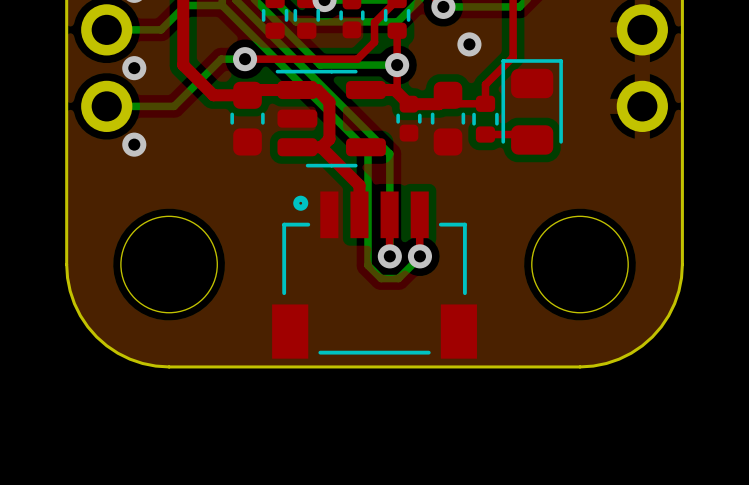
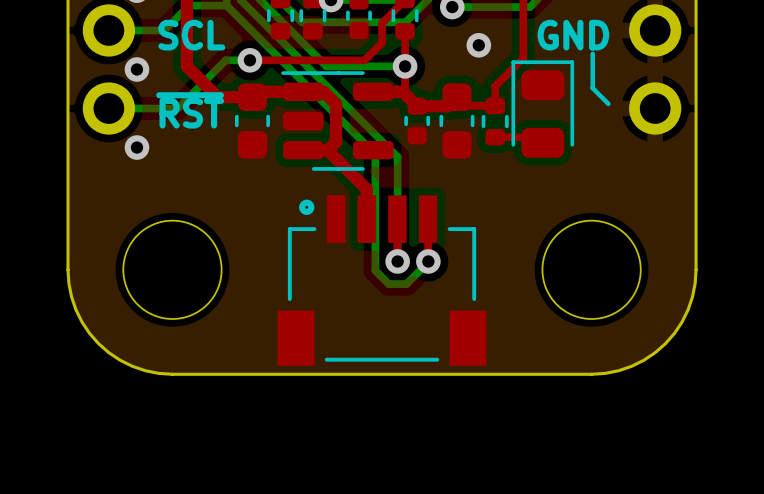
text: none -> SCL (191, 35)
text: none -> GND (573, 35)
line: none -> (592, 53) (592, 88) (608, 103)
text: none -> ~{RST} (190, 110)

